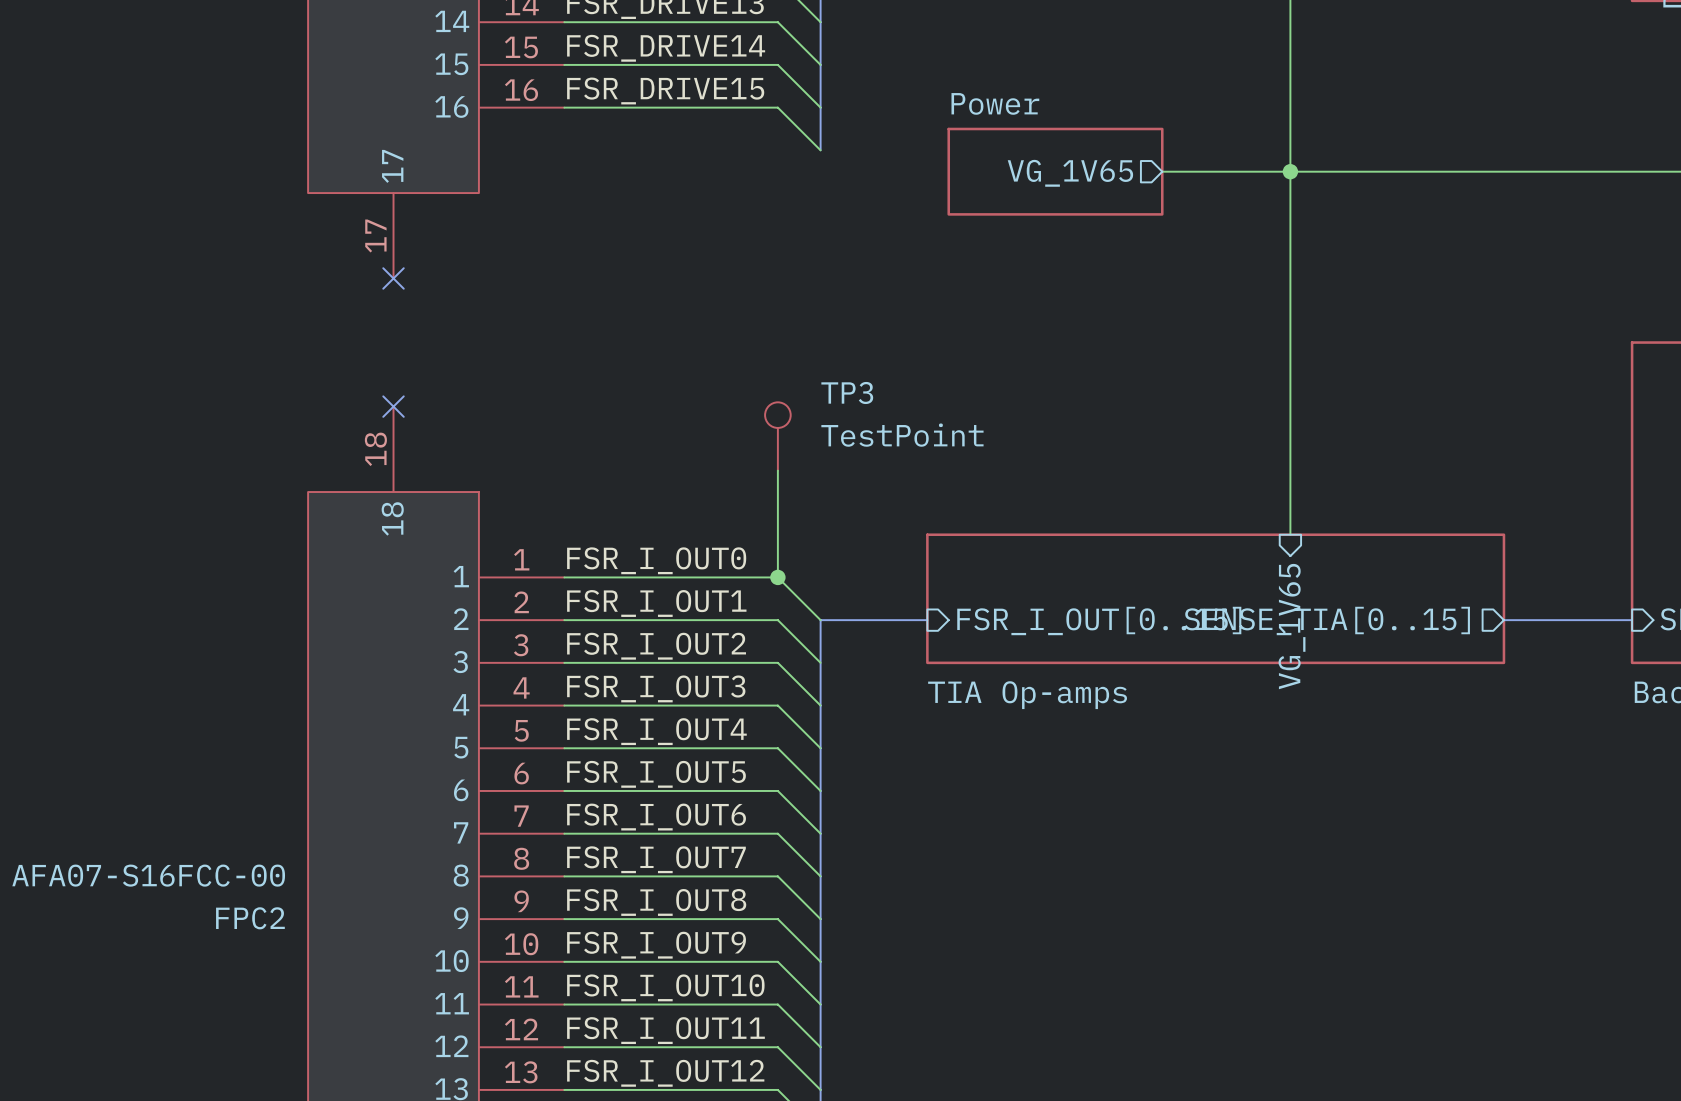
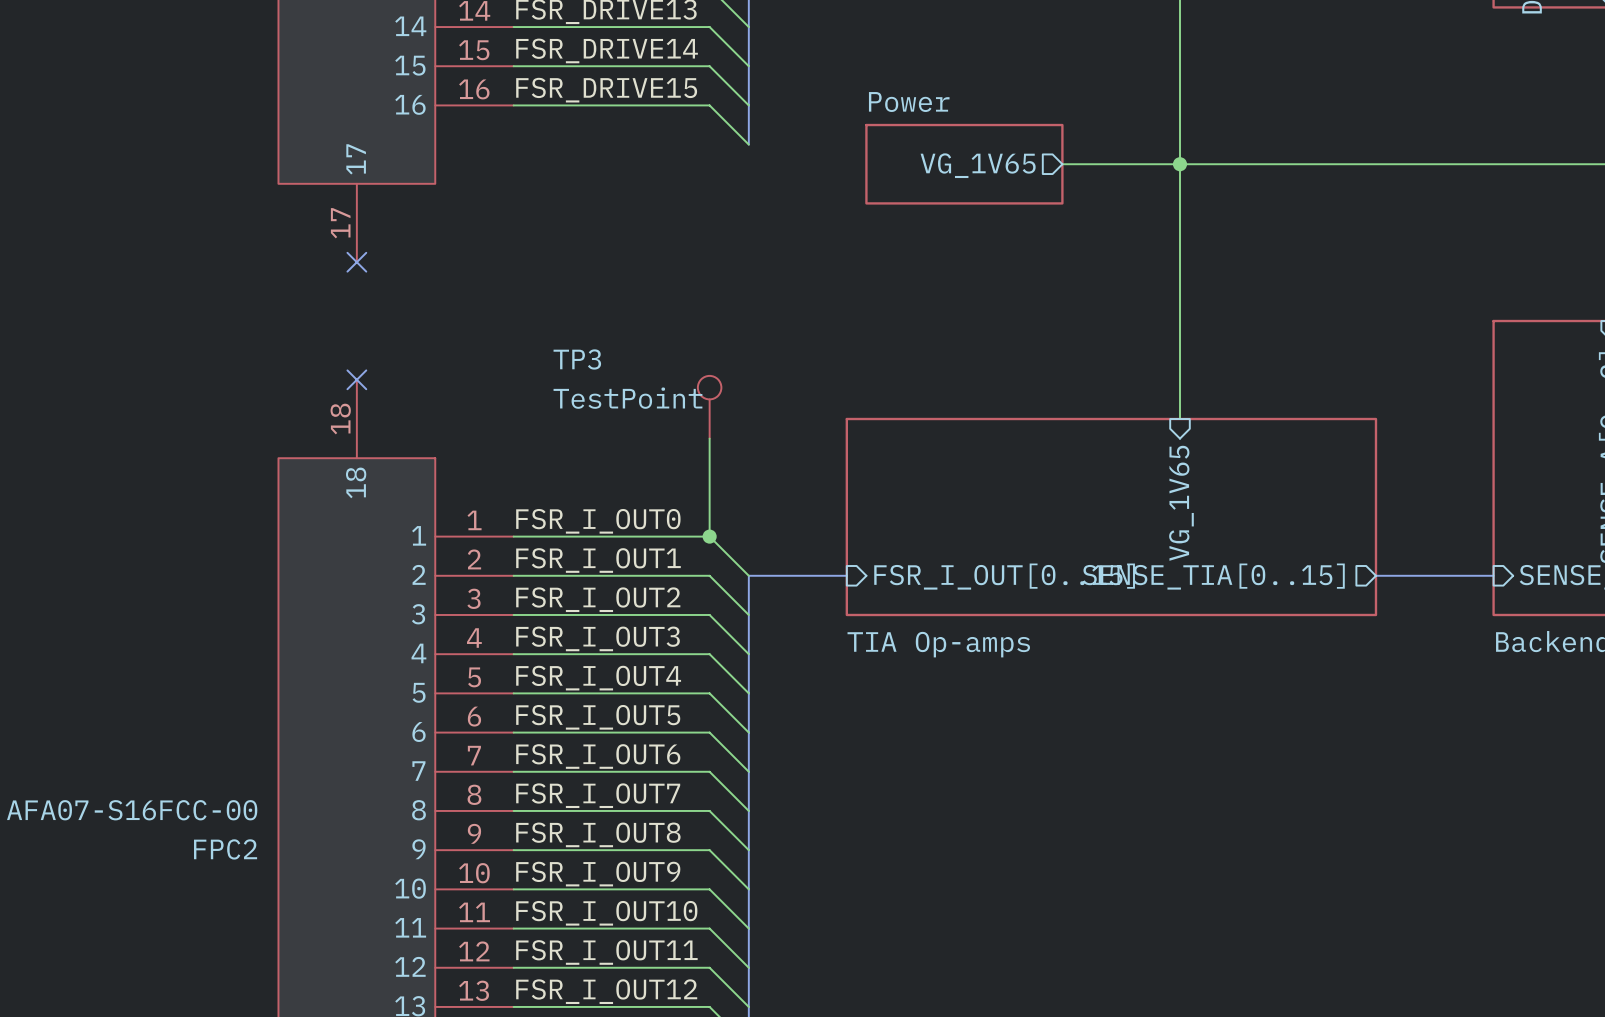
TP3 name position: TP3 (847, 392) -> TP3 (577, 359)
TP3 value position: TestPoint (902, 435) -> TestPoint (627, 398)
wire: (1290, 449) (1290, 534) -> none
sheet TIA Op-amps: none -> (1111, 517)
sheet TIA Op-amps: (1215, 598) -> none
sheet pin position: VG_1V65 (1292, 626) -> VG_1V65 (1181, 503)

